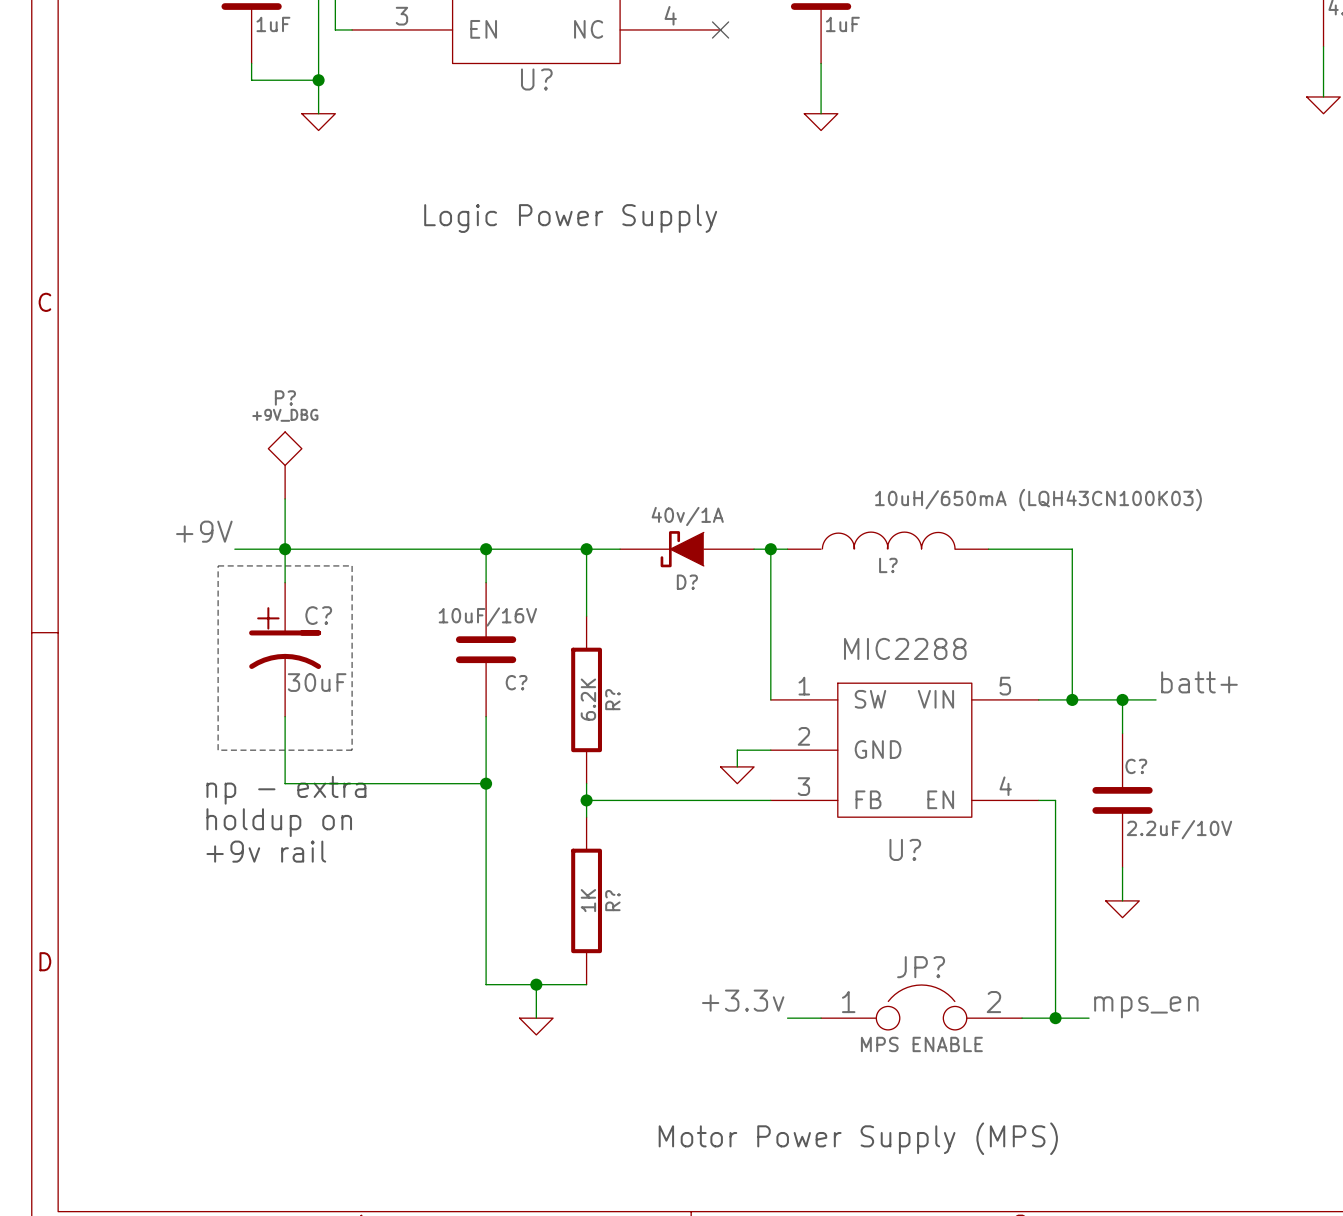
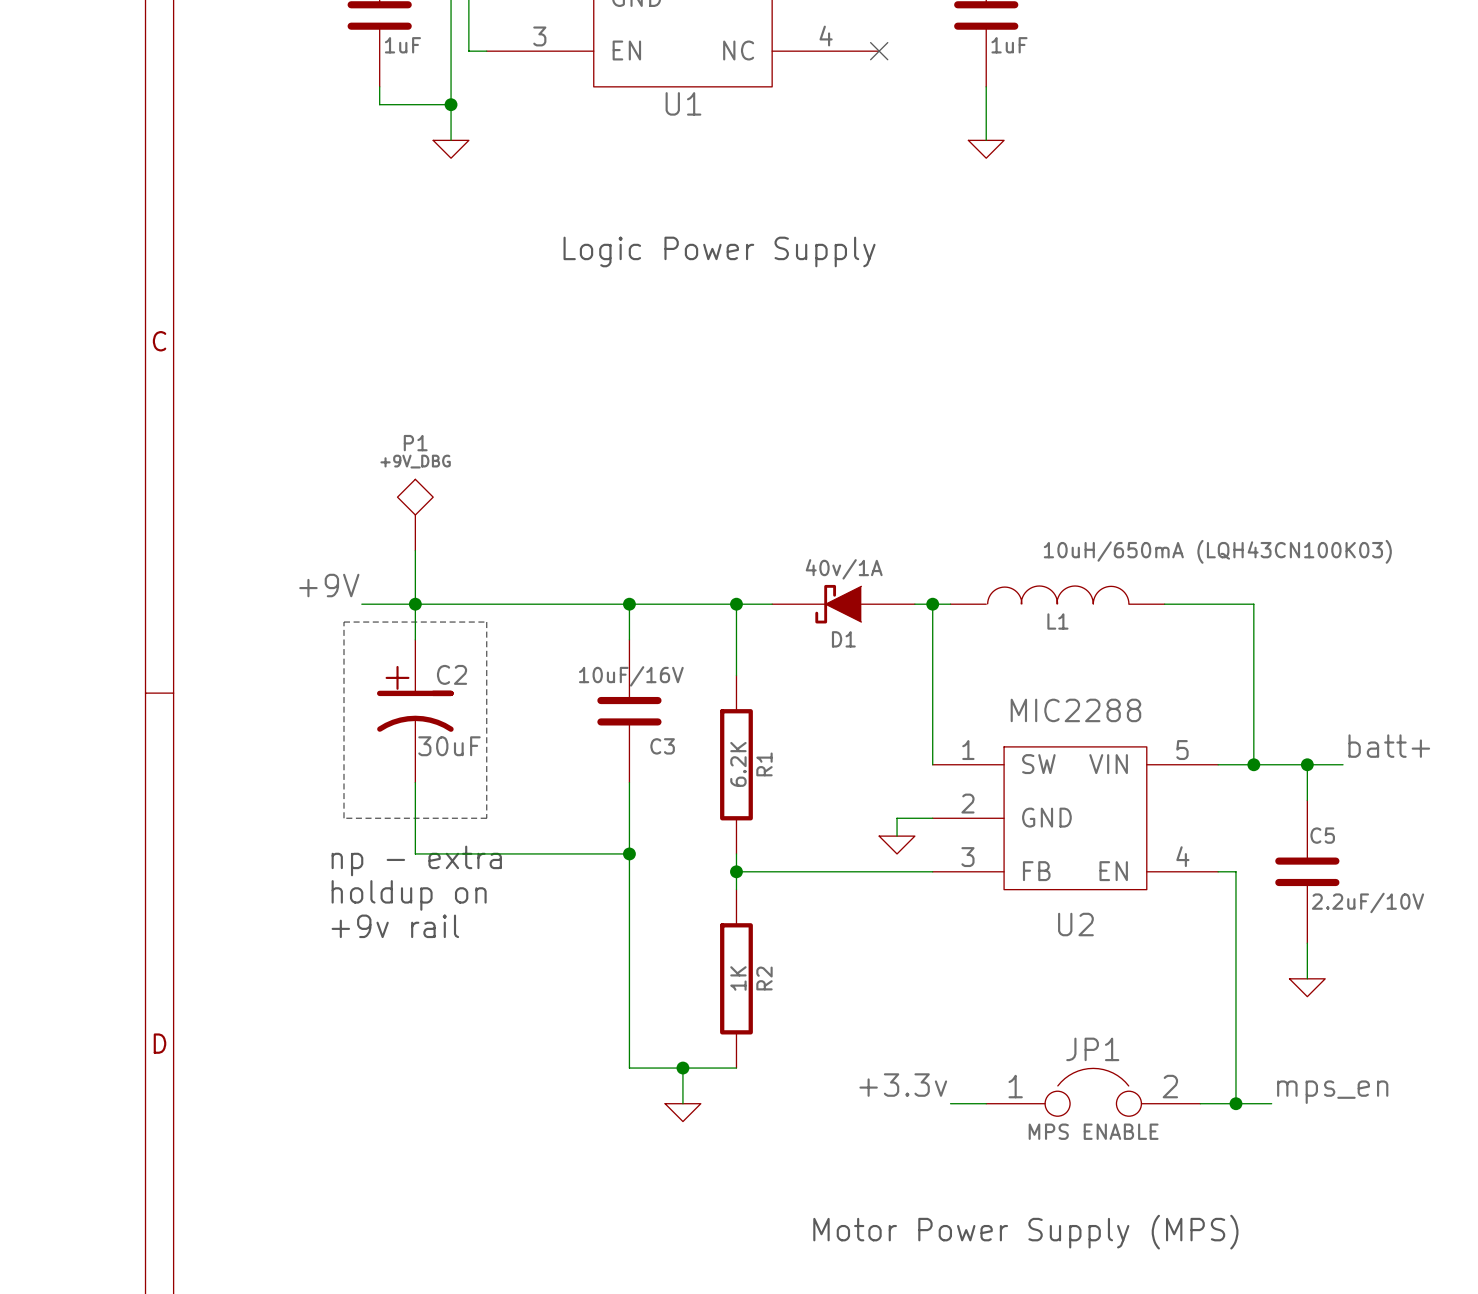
U? name: U? (536, 79) -> U1 (683, 103)
P? name: P? (285, 397) -> P1 (415, 443)
L? name: L? (888, 565) -> L1 (1057, 621)
D? name: D? (687, 582) -> D1 (843, 639)
C? name: C? (318, 615) -> C2 (452, 674)
C? name: C? (516, 682) -> C3 (662, 746)
R? name: R? (612, 699) -> R1 (764, 764)
C? name: C? (1136, 766) -> C5 (1322, 835)
U? name: U? (905, 849) -> U2 (1075, 924)
R? name: R? (612, 900) -> R2 (764, 978)
JP? name: JP? (921, 967) -> JP1 (1092, 1049)

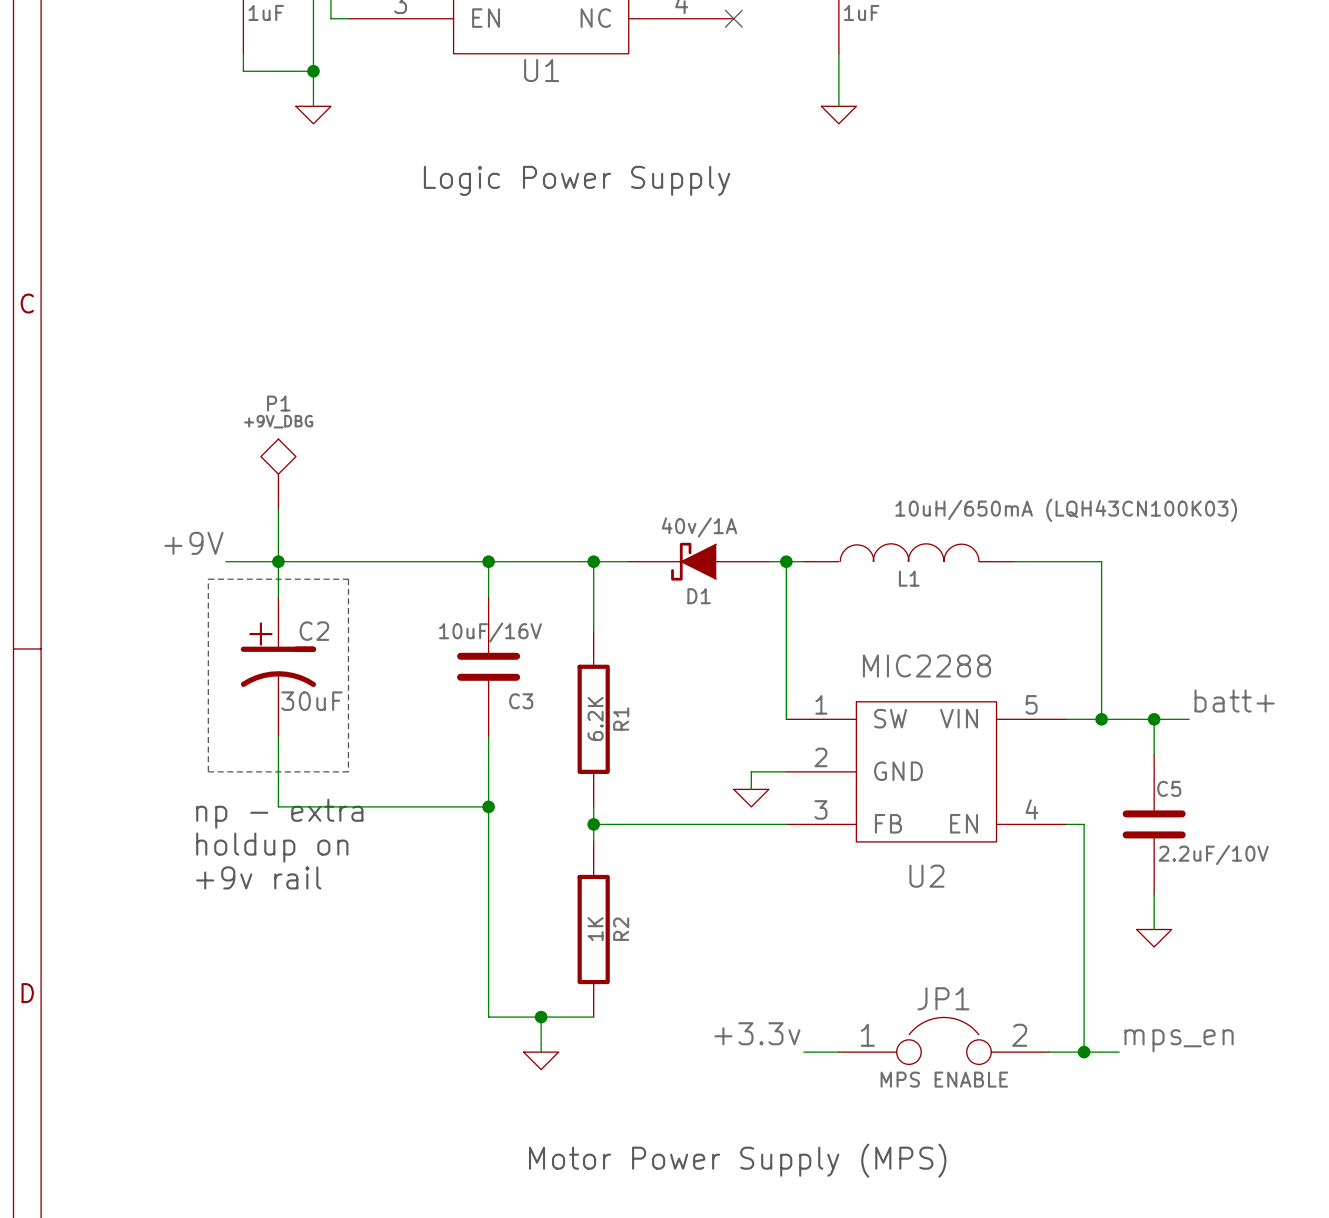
text position: Logic Power Supply (719, 251) -> Logic Power Supply (577, 180)
text position: Motor Power Supply (MPS) (1025, 1232) -> Motor Power Supply (MPS) (737, 1160)

